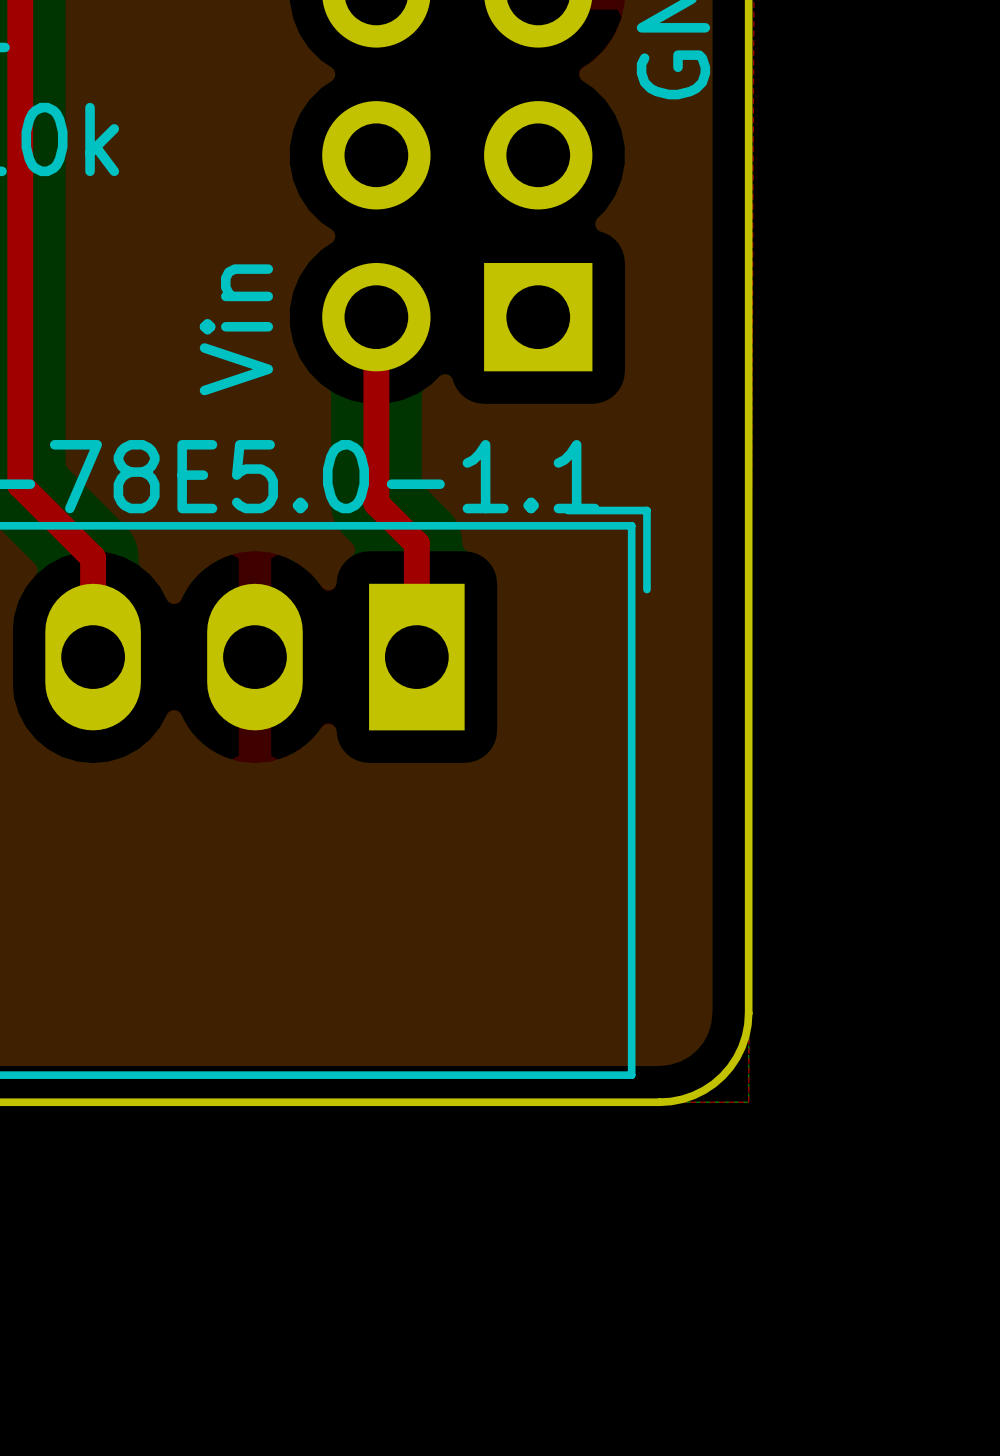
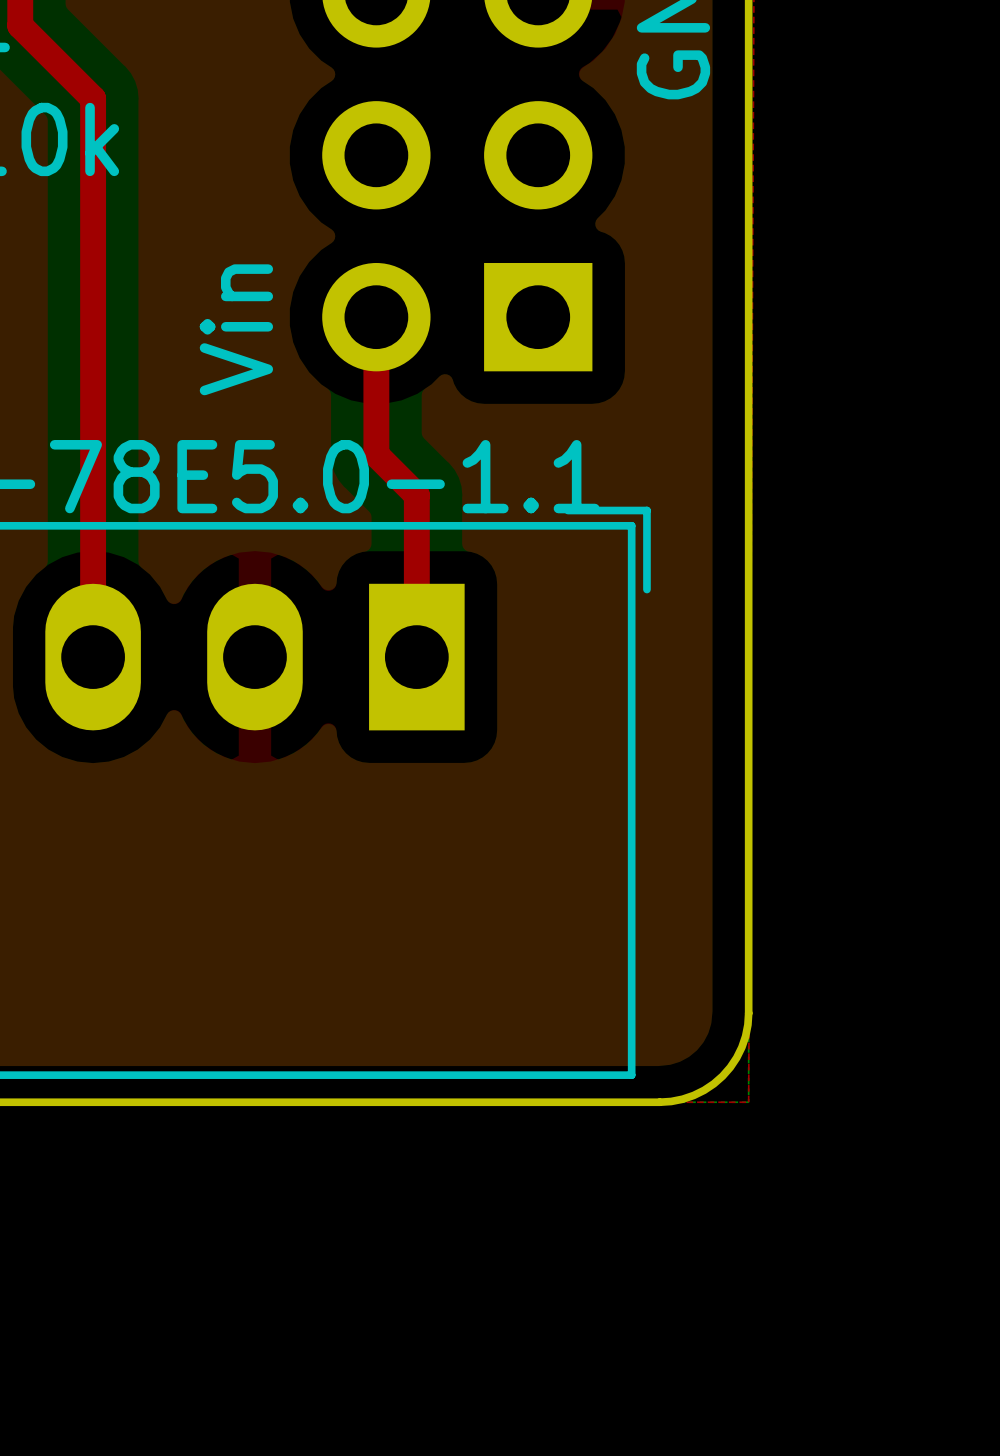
top track: (20, 25) (20, 485) (93, 557) -> (20, 25) (93, 98) (93, 557)
top track: (376, 454) (376, 503) (416, 543) -> (376, 454) (416, 495) (416, 543)

